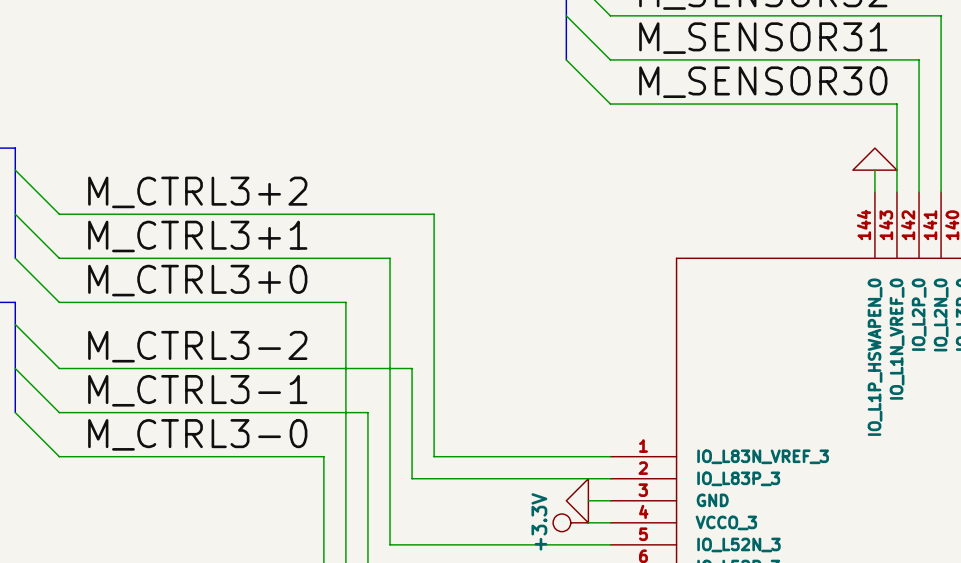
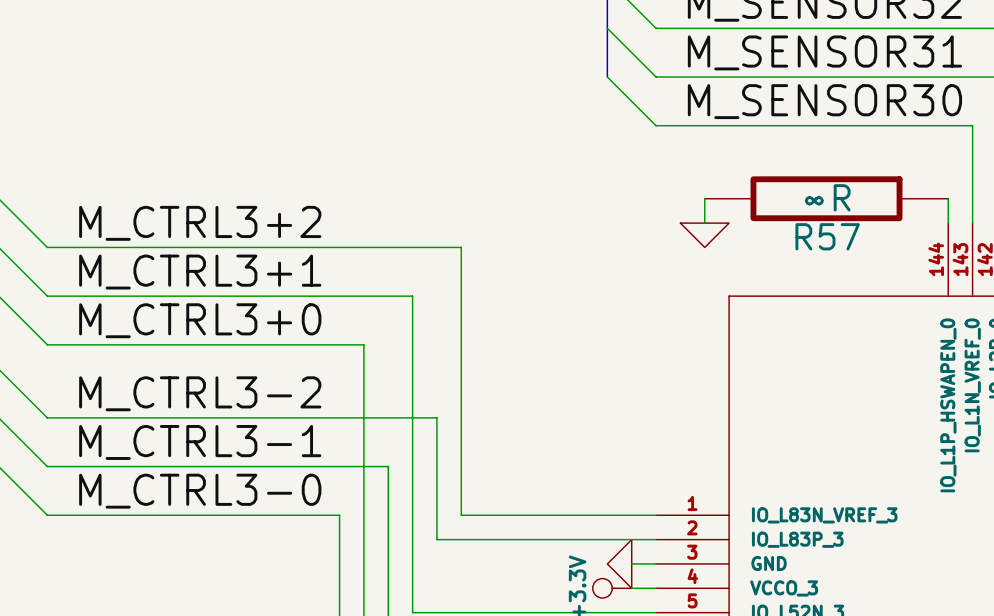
power symbol rotation: 0° (874, 159) -> 180° (704, 235)
power symbol position: (874, 159) -> (704, 235)
wire: none -> (704, 198) (704, 223)
R57: none -> ∞R (826, 198)

